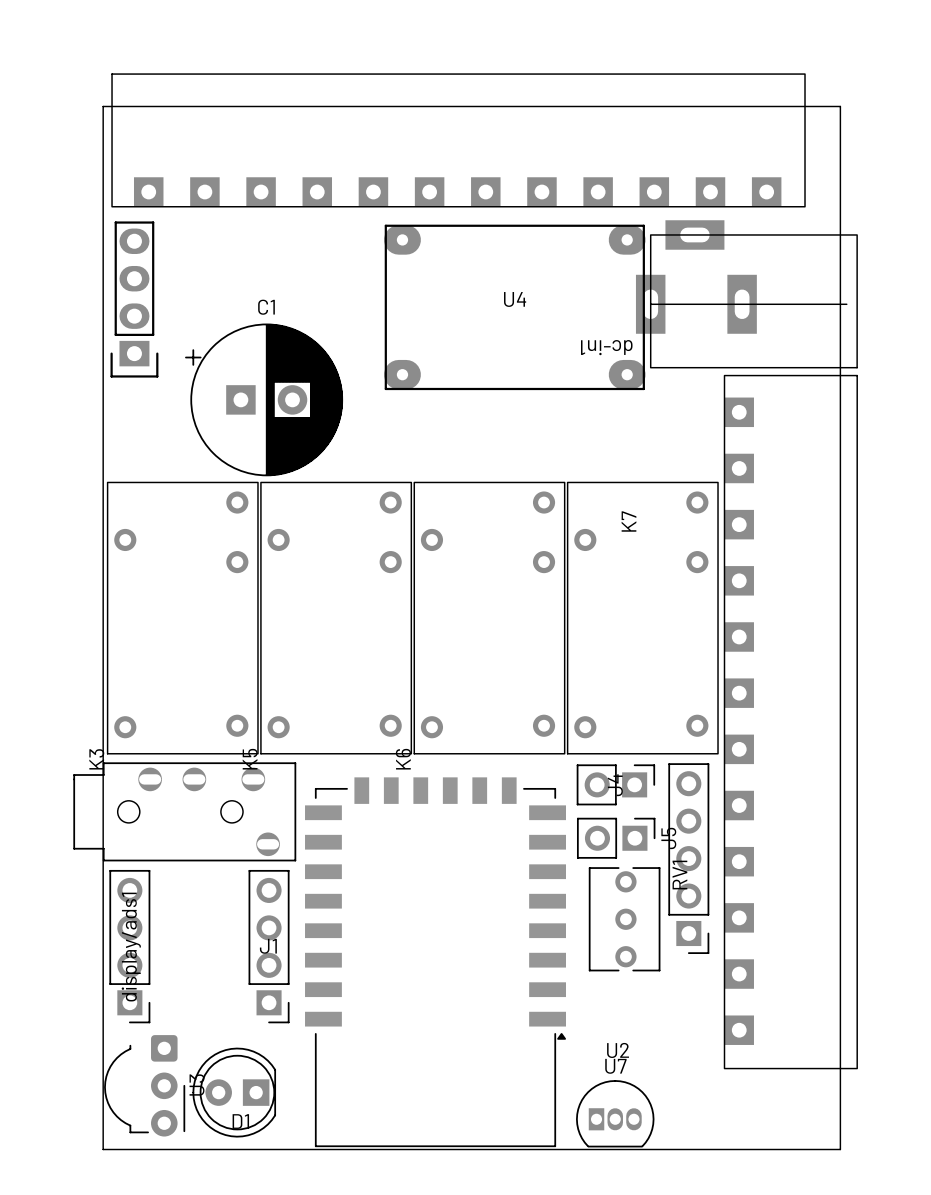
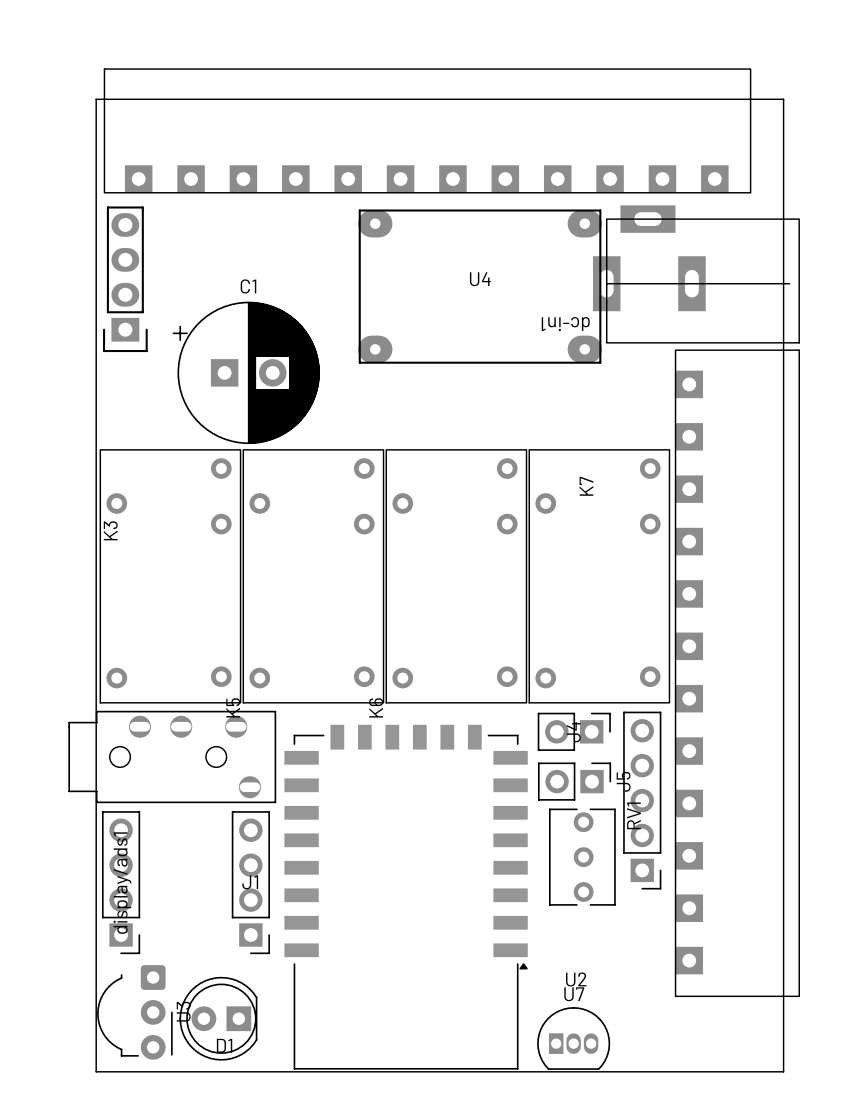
K3 name position: K3 (96, 759) -> K3 (110, 530)

